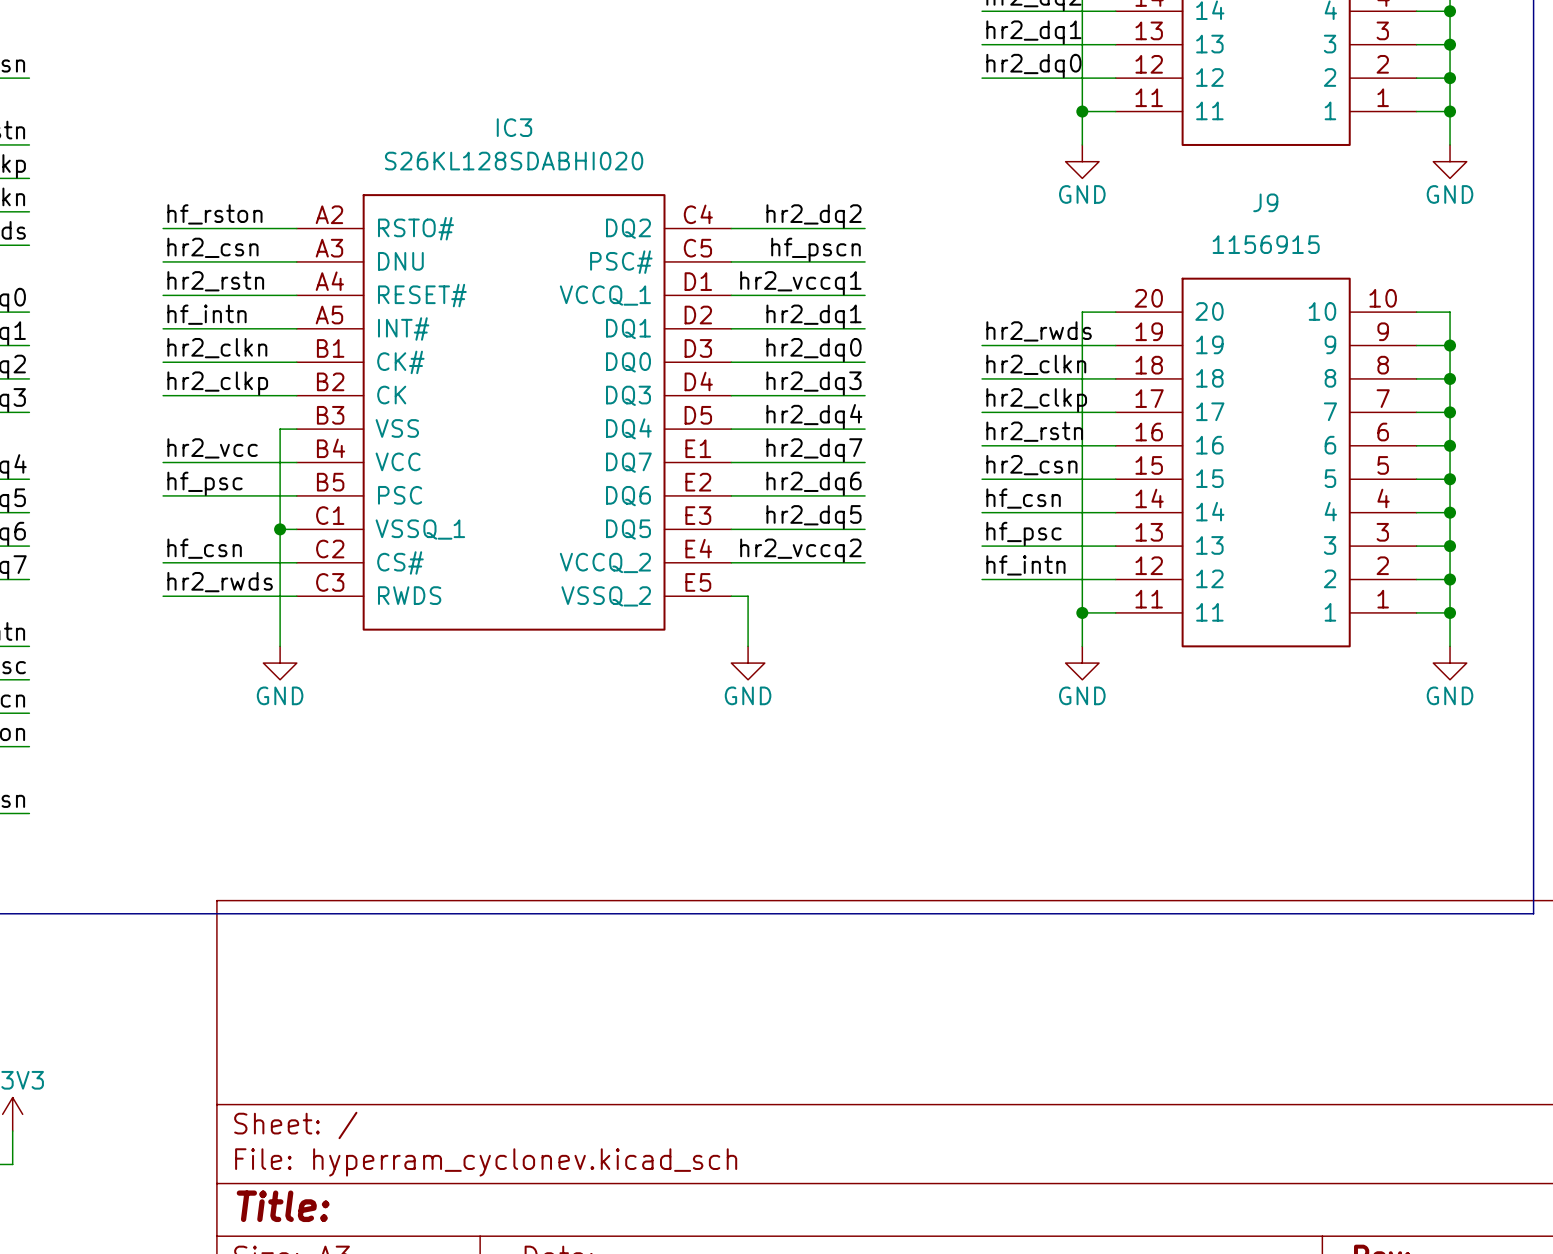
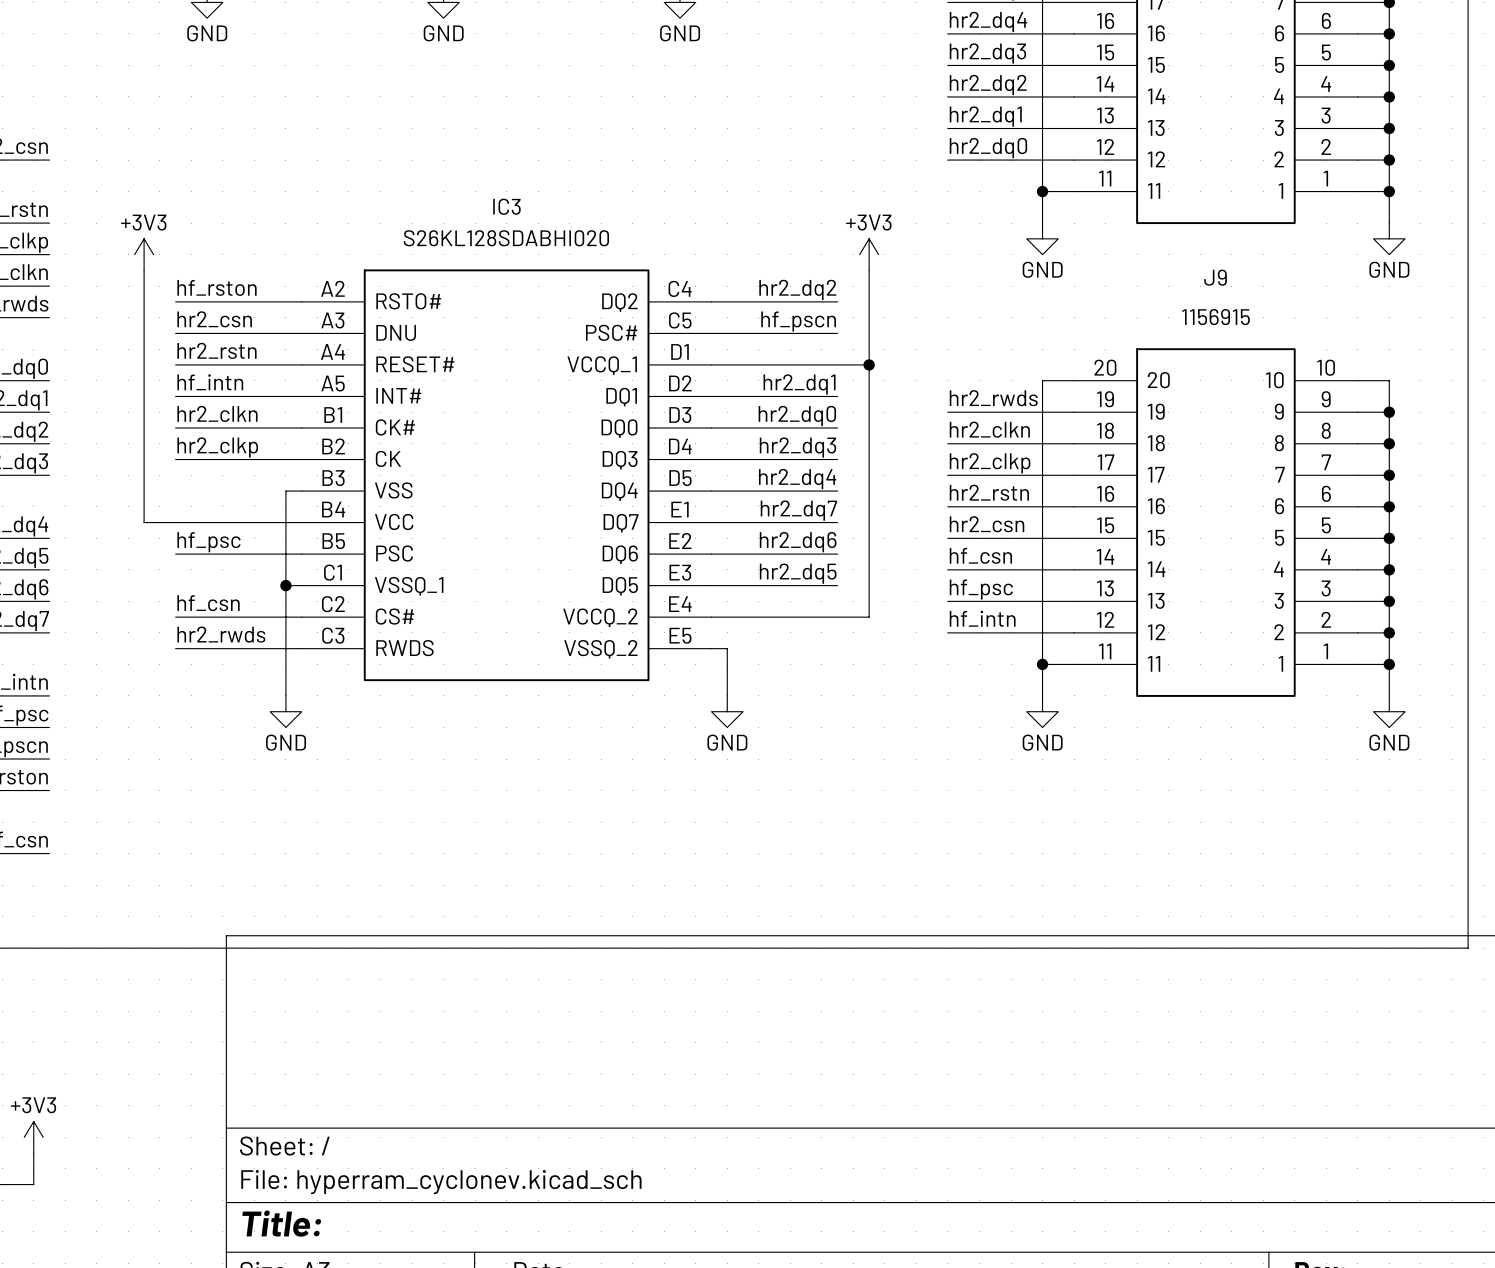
power symbol: none -> +3V3 (144, 254)
power symbol: none -> +3V3 (869, 254)
wire: none -> (144, 270) (144, 522) (175, 522)
wire: none -> (869, 270) (869, 617) (837, 617)
label: hr2_vccq1 (800, 283) -> none
wire: none -> (837, 364) (869, 364)
junction: none -> (869, 364)
label: hr2_vcc (212, 448) -> none
label: hr2_vccq2 (800, 550) -> none

